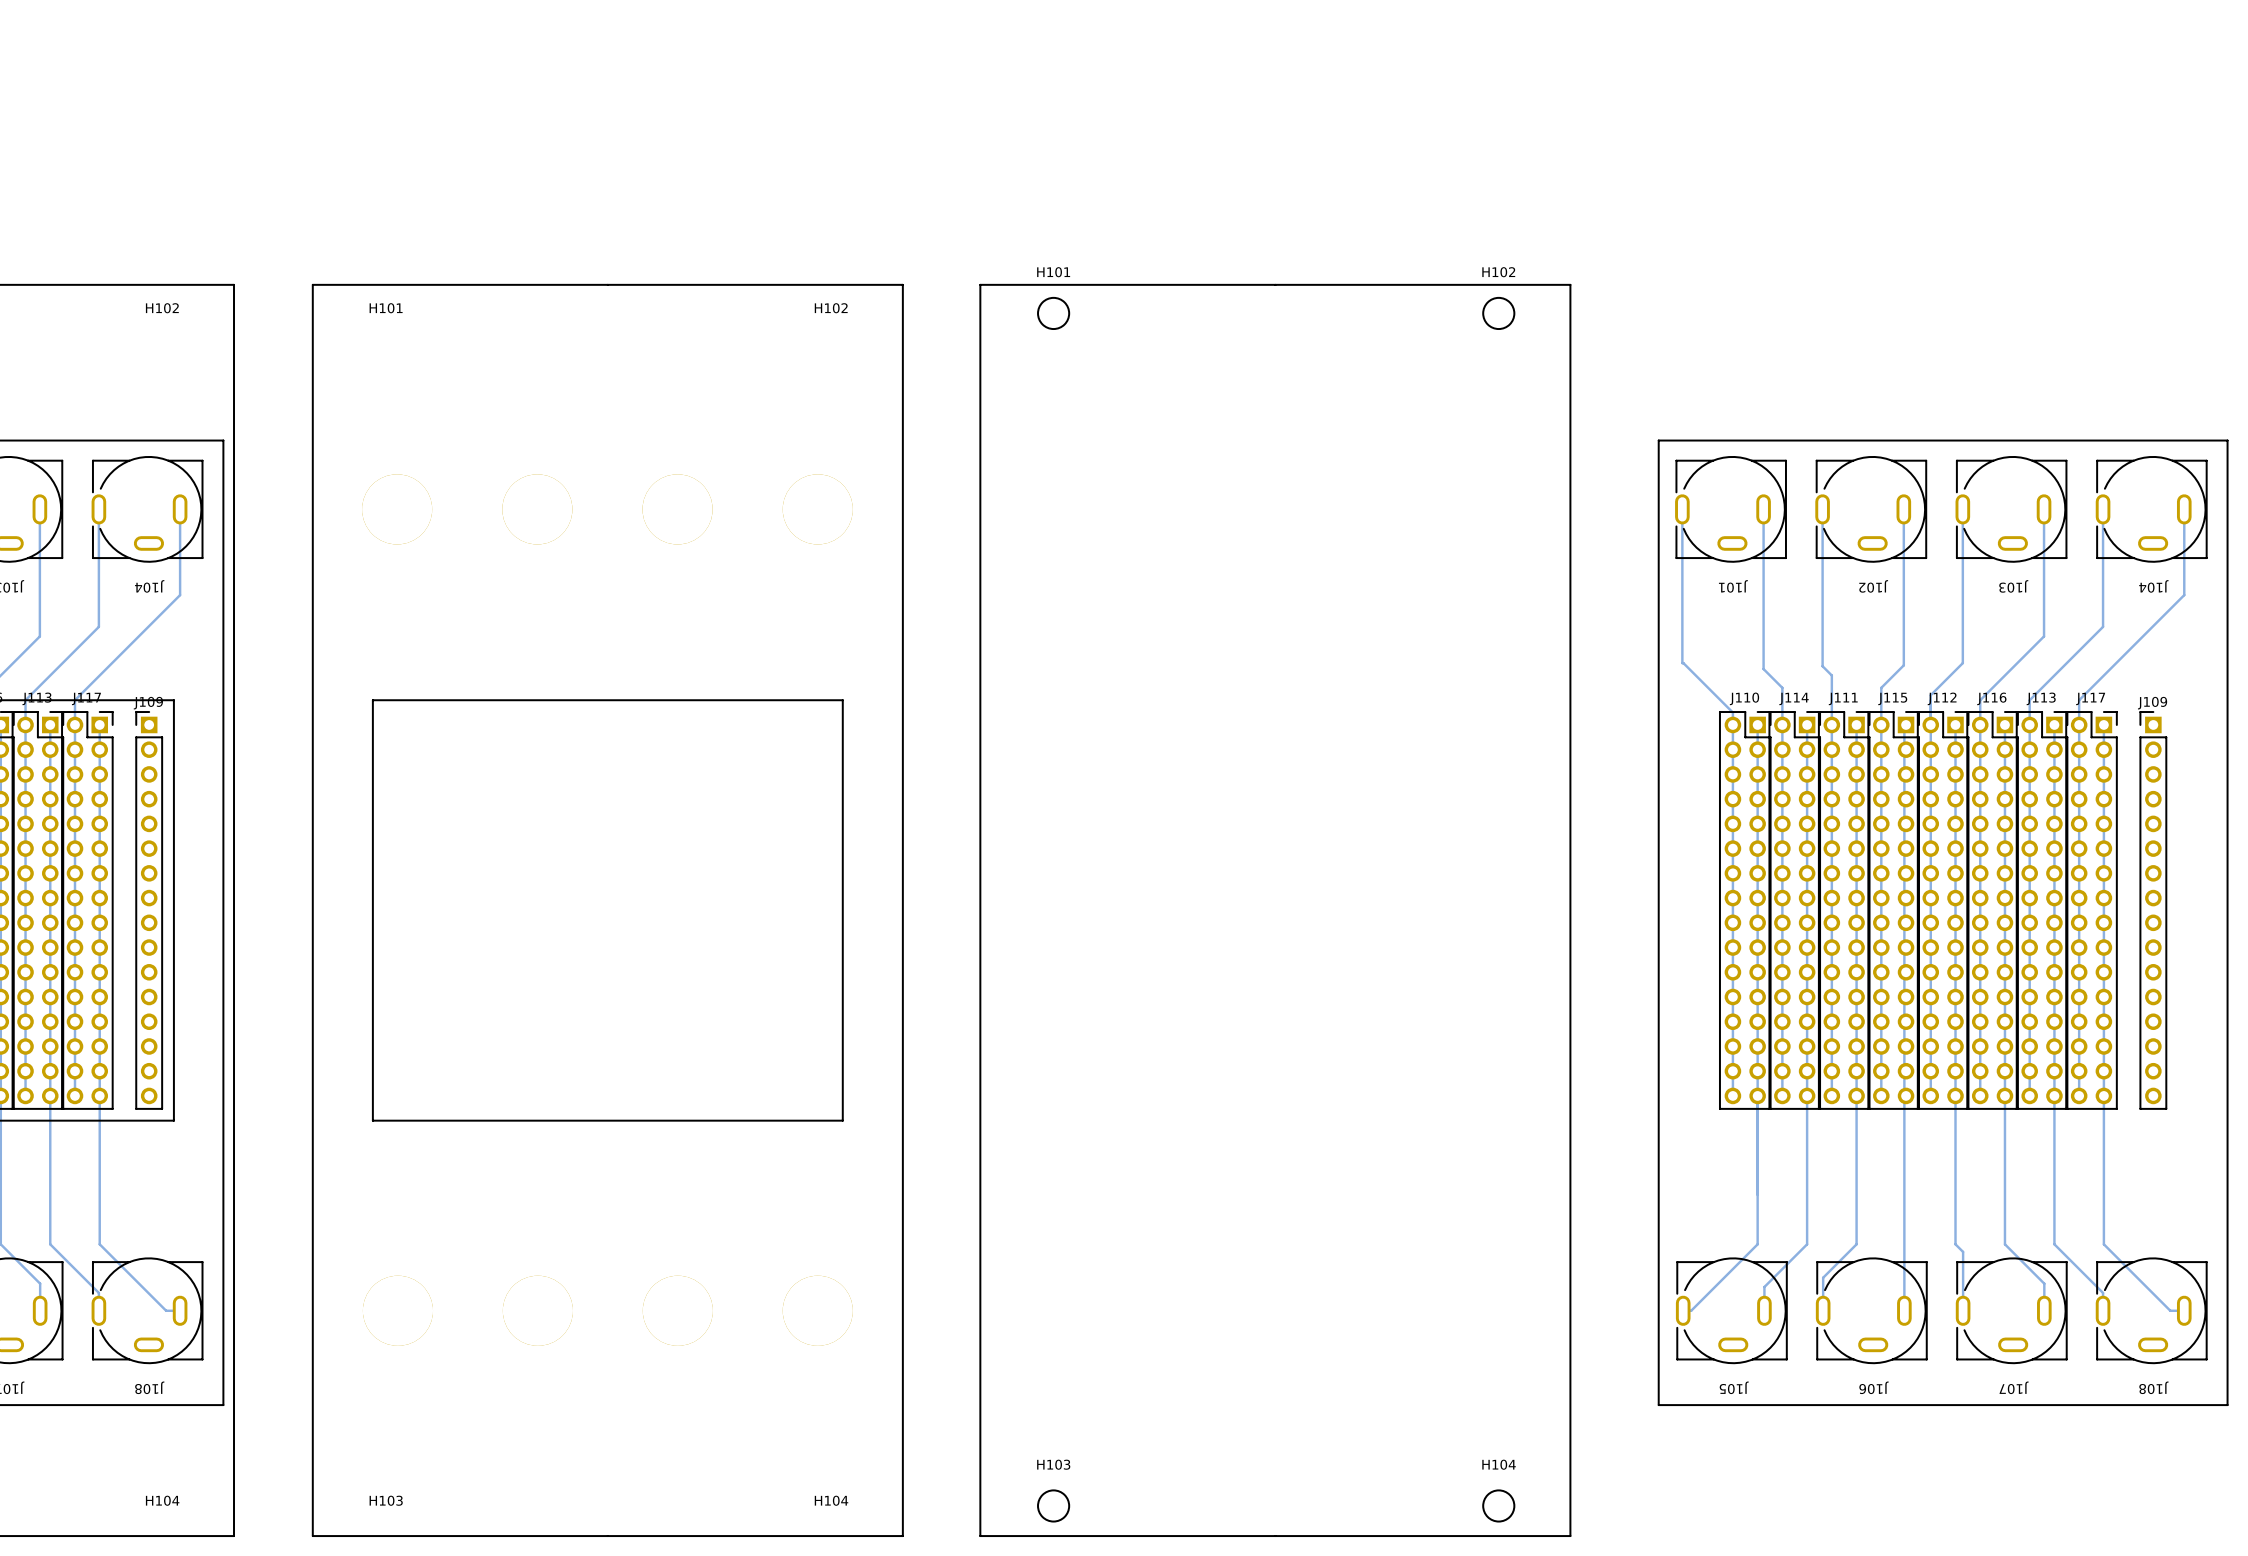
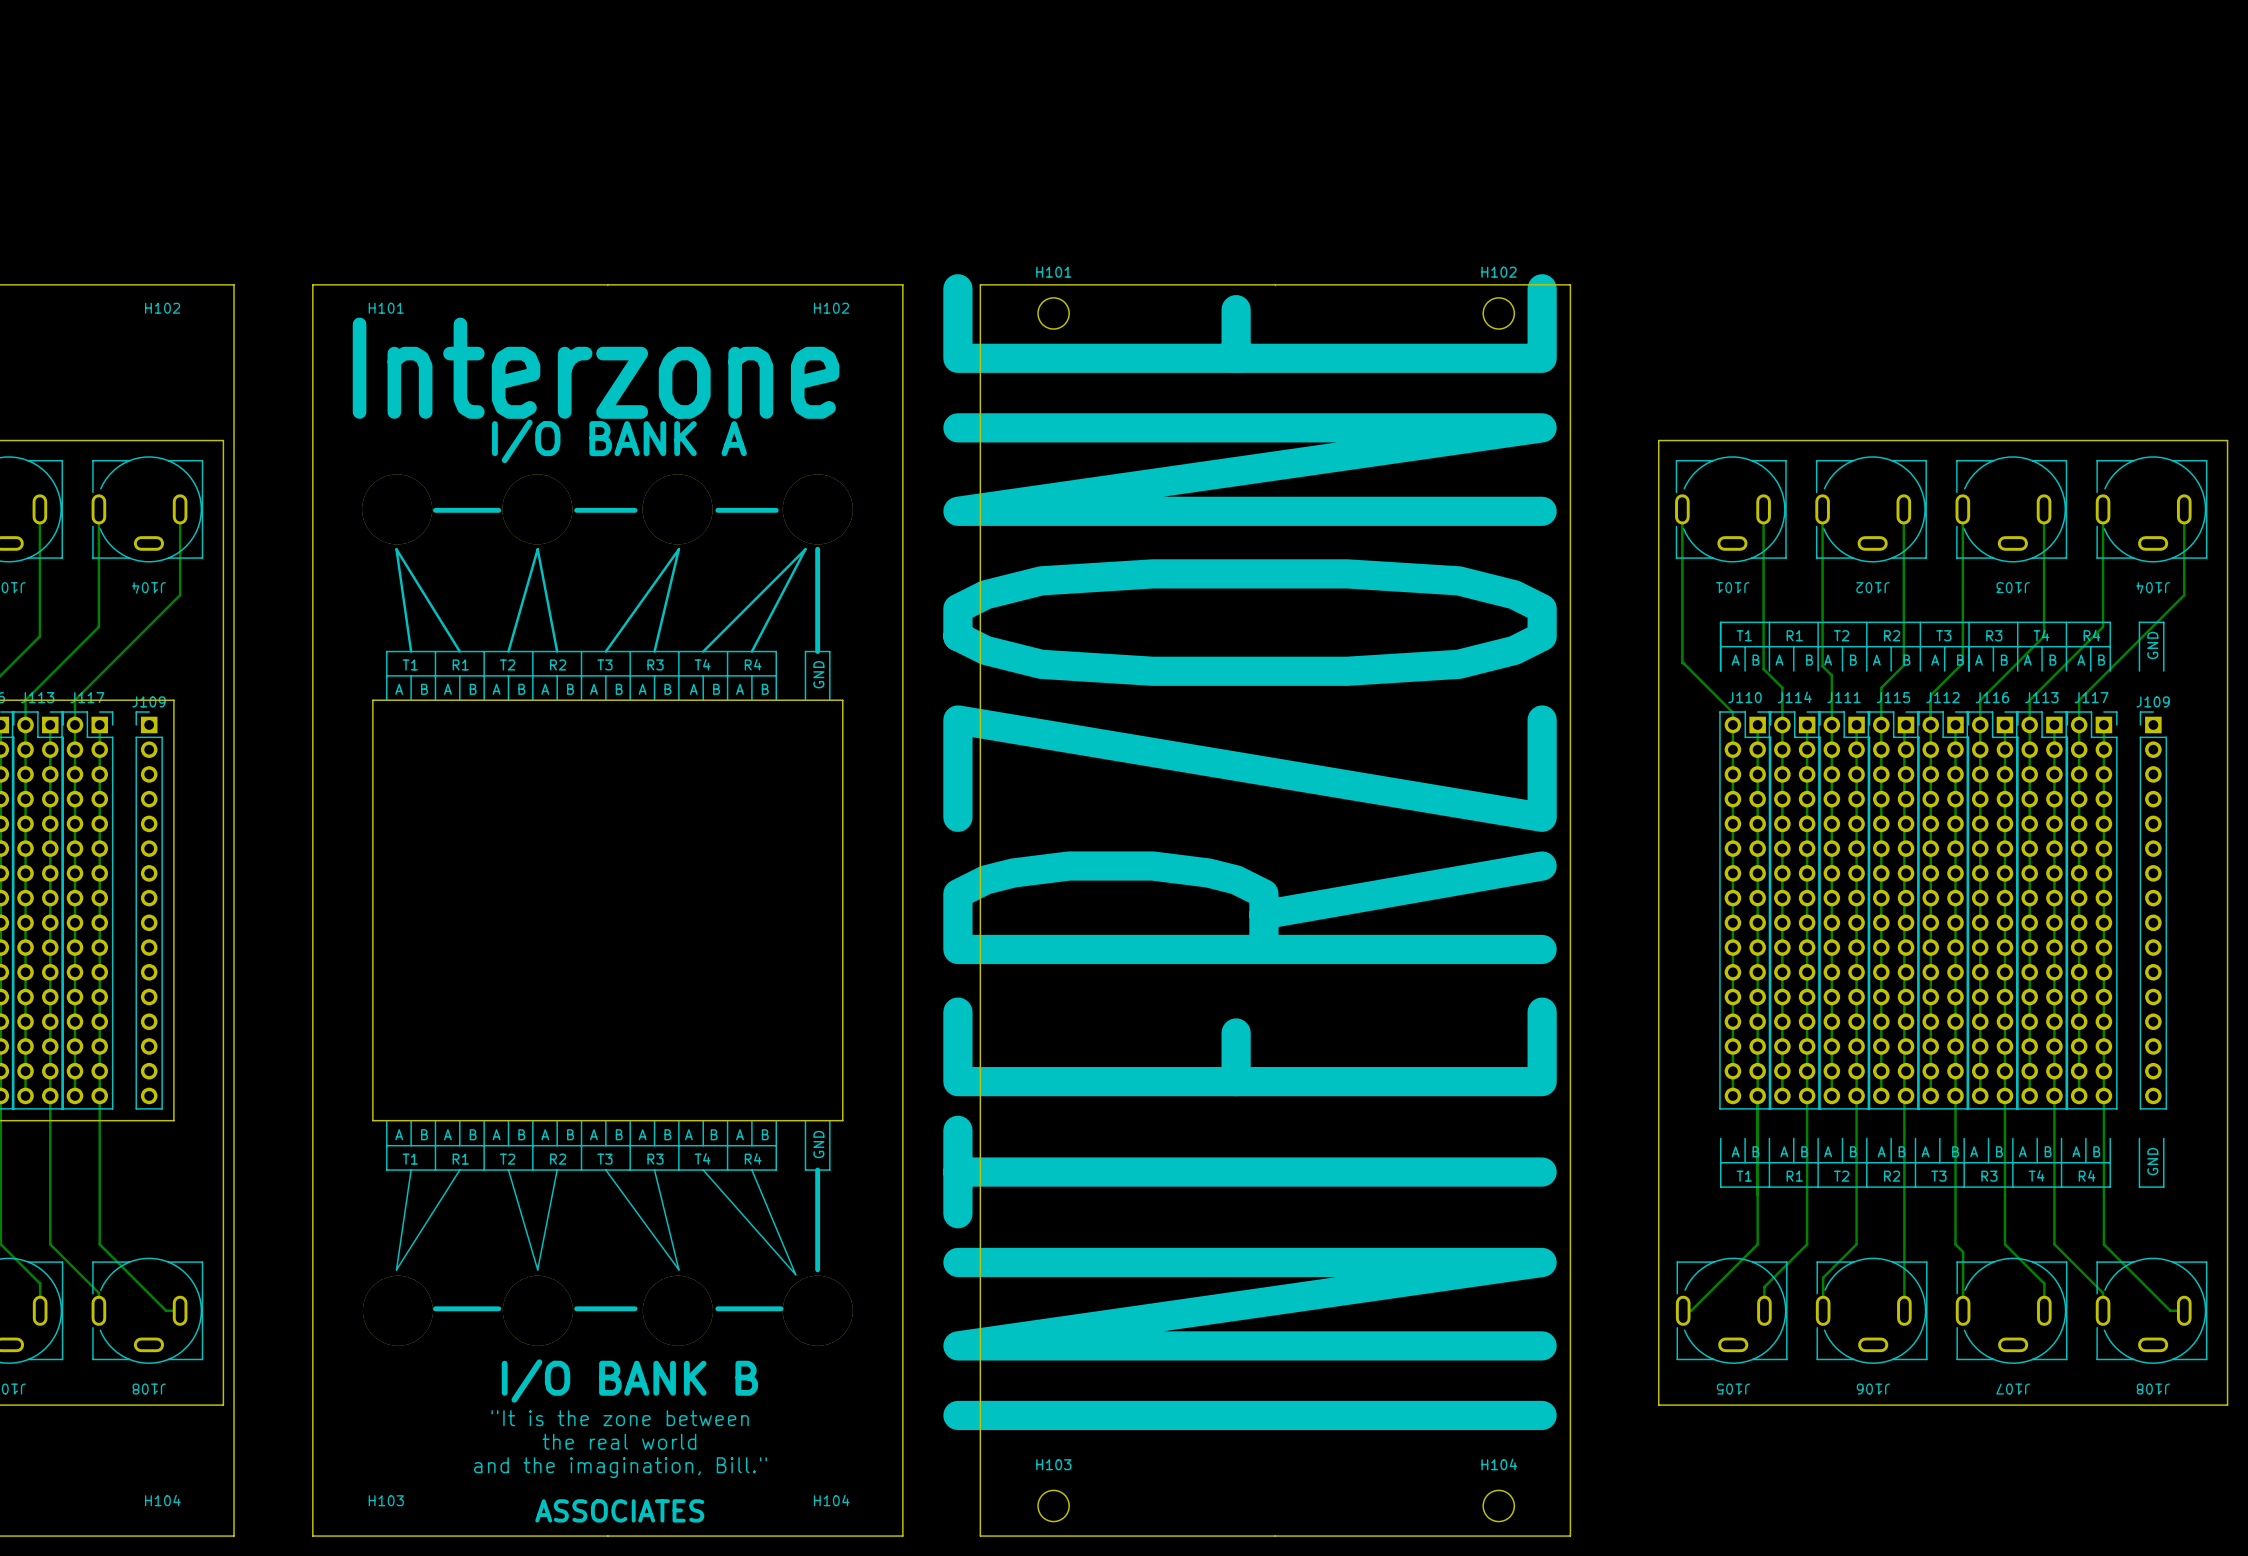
text: none -> Interzone (596, 368)
text: none -> I/O BANK A (619, 441)
line: none -> (435, 510) (498, 510)
line: none -> (576, 510) (635, 510)
line: none -> (717, 510) (776, 510)
line: none -> (817, 549) (817, 651)
line: none -> (1769, 622) (1769, 671)
line: none -> (1818, 622) (1818, 671)
line: none -> (1866, 622) (1866, 671)
line: none -> (1920, 622) (1920, 671)
line: none -> (1969, 622) (1969, 671)
line: none -> (2017, 622) (2017, 671)
line: none -> (2066, 622) (2066, 671)
text: none -> T1 (1744, 635)
text: none -> R1 (1794, 635)
text: none -> T2 (1841, 635)
text: none -> R2 (1892, 635)
text: none -> T3 (1943, 635)
text: none -> R3 (1994, 635)
text: none -> T4 (2041, 635)
text: none -> R4 (2091, 635)
text: none -> GND (2152, 645)
line: none -> (1720, 646) (2110, 646)
line: none -> (1745, 646) (1745, 671)
line: none -> (1793, 646) (1793, 671)
line: none -> (1842, 646) (1842, 671)
line: none -> (1891, 646) (1891, 671)
line: none -> (1944, 646) (1944, 671)
line: none -> (1993, 646) (1993, 671)
line: none -> (2042, 646) (2042, 671)
line: none -> (2090, 646) (2090, 671)
line: none -> (411, 651) (396, 549) (459, 651)
line: none -> (435, 651) (435, 700)
line: none -> (484, 651) (484, 700)
line: none -> (508, 651) (537, 549) (557, 651)
line: none -> (532, 651) (532, 700)
line: none -> (581, 651) (581, 700)
line: none -> (605, 651) (678, 549) (654, 651)
line: none -> (630, 651) (630, 700)
line: none -> (678, 651) (678, 700)
line: none -> (703, 651) (805, 549) (751, 651)
line: none -> (727, 651) (727, 700)
text: none -> A (1735, 660)
text: none -> B (1756, 660)
text: none -> A (1779, 660)
text: none -> B (1809, 660)
text: none -> A (1828, 660)
text: none -> B (1853, 660)
text: none -> A (1876, 660)
text: none -> B (1906, 660)
text: none -> A (1935, 660)
text: none -> B (1960, 660)
text: none -> A (1979, 660)
text: none -> B (2004, 660)
text: none -> A (2027, 660)
text: none -> B (2052, 660)
text: none -> A (2081, 660)
text: none -> B (2101, 660)
text: none -> T1 (410, 664)
text: none -> R1 (460, 664)
text: none -> T2 (507, 664)
text: none -> R2 (558, 664)
text: none -> T3 (604, 664)
text: none -> R3 (655, 664)
text: none -> T4 (702, 664)
text: none -> R4 (753, 664)
line: none -> (1720, 671) (1720, 622) (2110, 622) (2110, 671)
line: none -> (2139, 671) (2139, 622) (2163, 622) (2163, 671)
line: none -> (386, 675) (776, 675)
line: none -> (411, 675) (411, 700)
line: none -> (459, 675) (459, 700)
line: none -> (508, 675) (508, 700)
line: none -> (557, 675) (557, 700)
line: none -> (605, 675) (605, 700)
line: none -> (654, 675) (654, 700)
line: none -> (703, 675) (703, 700)
line: none -> (751, 675) (751, 700)
text: none -> GND (818, 674)
text: none -> A (399, 689)
text: none -> B (424, 689)
text: none -> A (447, 689)
text: none -> B (473, 689)
text: none -> A (496, 689)
text: none -> B (521, 689)
text: none -> A (545, 689)
text: none -> B (570, 689)
text: none -> A (593, 689)
text: none -> B (619, 689)
text: none -> A (642, 689)
text: none -> B (667, 689)
text: none -> A (693, 689)
text: none -> B (716, 689)
text: none -> A (740, 689)
text: none -> B (765, 689)
line: none -> (386, 700) (386, 651) (776, 651) (776, 700)
line: none -> (805, 700) (805, 651) (829, 651) (829, 700)
text: none -> INTERZONE (1250, 852)
line: none -> (386, 1121) (386, 1170) (776, 1170) (776, 1121)
line: none -> (411, 1121) (411, 1145)
line: none -> (435, 1121) (435, 1170)
line: none -> (459, 1121) (459, 1145)
line: none -> (484, 1121) (484, 1170)
line: none -> (508, 1121) (508, 1145)
line: none -> (532, 1121) (532, 1170)
line: none -> (557, 1121) (557, 1145)
line: none -> (581, 1121) (581, 1170)
line: none -> (605, 1121) (605, 1145)
line: none -> (630, 1121) (630, 1170)
line: none -> (654, 1121) (654, 1145)
line: none -> (678, 1121) (678, 1170)
line: none -> (703, 1121) (703, 1145)
line: none -> (727, 1121) (727, 1170)
line: none -> (751, 1121) (751, 1145)
line: none -> (805, 1121) (805, 1170) (829, 1170) (829, 1121)
text: none -> A (399, 1134)
text: none -> B (424, 1134)
text: none -> A (447, 1134)
text: none -> B (473, 1134)
text: none -> A (496, 1134)
text: none -> B (521, 1134)
text: none -> A (545, 1134)
text: none -> B (570, 1134)
text: none -> A (593, 1134)
text: none -> B (619, 1134)
text: none -> A (642, 1134)
text: none -> B (667, 1134)
text: none -> A (688, 1134)
text: none -> B (714, 1134)
text: none -> A (740, 1134)
text: none -> B (765, 1134)
line: none -> (1720, 1138) (1720, 1187) (2110, 1187) (2110, 1138)
line: none -> (1745, 1138) (1745, 1162)
line: none -> (1769, 1138) (1769, 1187)
line: none -> (1793, 1138) (1793, 1162)
line: none -> (1818, 1138) (1818, 1187)
line: none -> (1842, 1138) (1842, 1162)
line: none -> (1866, 1138) (1866, 1187)
line: none -> (1891, 1138) (1891, 1162)
line: none -> (1915, 1138) (1915, 1187)
line: none -> (1939, 1138) (1939, 1162)
line: none -> (1964, 1138) (1964, 1187)
line: none -> (1988, 1138) (1988, 1162)
line: none -> (2012, 1138) (2012, 1187)
line: none -> (2037, 1138) (2037, 1162)
line: none -> (2061, 1138) (2061, 1187)
line: none -> (2085, 1138) (2085, 1162)
line: none -> (2139, 1138) (2139, 1187) (2163, 1187) (2163, 1138)
line: none -> (386, 1145) (776, 1145)
text: none -> GND (818, 1144)
text: none -> A (1735, 1151)
text: none -> B (1756, 1151)
text: none -> A (1784, 1151)
text: none -> B (1804, 1151)
text: none -> A (1828, 1151)
text: none -> B (1853, 1151)
text: none -> A (1881, 1151)
text: none -> B (1902, 1151)
text: none -> A (1925, 1151)
text: none -> B (1955, 1151)
text: none -> A (1974, 1151)
text: none -> B (1999, 1151)
text: none -> A (2022, 1151)
text: none -> B (2048, 1151)
text: none -> A (2076, 1151)
text: none -> B (2096, 1151)
text: none -> T1 (410, 1159)
text: none -> R1 (460, 1159)
text: none -> T2 (507, 1159)
text: none -> R2 (558, 1159)
text: none -> T3 (604, 1159)
text: none -> R3 (655, 1159)
text: none -> T4 (702, 1158)
text: none -> R4 (753, 1158)
line: none -> (1720, 1162) (2110, 1162)
text: none -> GND (2152, 1161)
line: none -> (411, 1170) (396, 1269) (459, 1170)
line: none -> (508, 1170) (537, 1269) (557, 1170)
line: none -> (605, 1170) (678, 1269) (654, 1170)
line: none -> (703, 1170) (795, 1274) (751, 1170)
line: none -> (817, 1170) (817, 1269)
text: none -> T1 (1744, 1176)
text: none -> R1 (1794, 1176)
text: none -> T2 (1841, 1176)
text: none -> R2 (1892, 1176)
text: none -> T3 (1938, 1176)
text: none -> R3 (1989, 1176)
text: none -> T4 (2036, 1175)
text: none -> R4 (2087, 1175)
line: none -> (435, 1308) (498, 1308)
line: none -> (576, 1308) (635, 1308)
line: none -> (717, 1308) (781, 1308)
text: none -> I/O BANK B (629, 1381)
text: none -> "It is the zone between (620, 1418)
text: none -> the real world (619, 1441)
text: none -> and the imagination, Bill." (620, 1467)
text: none -> ASSOCIATES (619, 1510)

